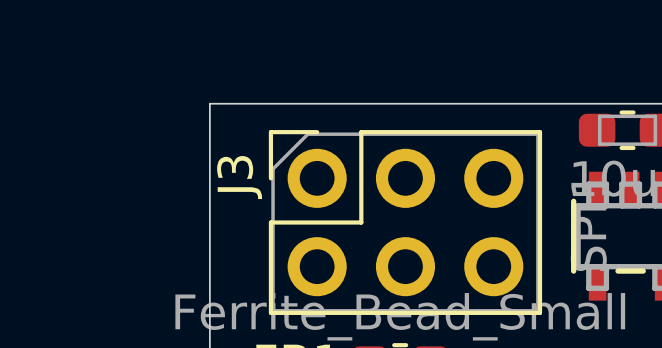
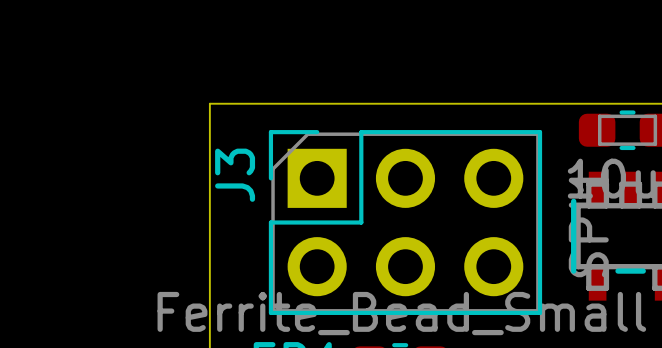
J3 footprint: [268, 130, 543, 315] -> [268, 130, 543, 315]

